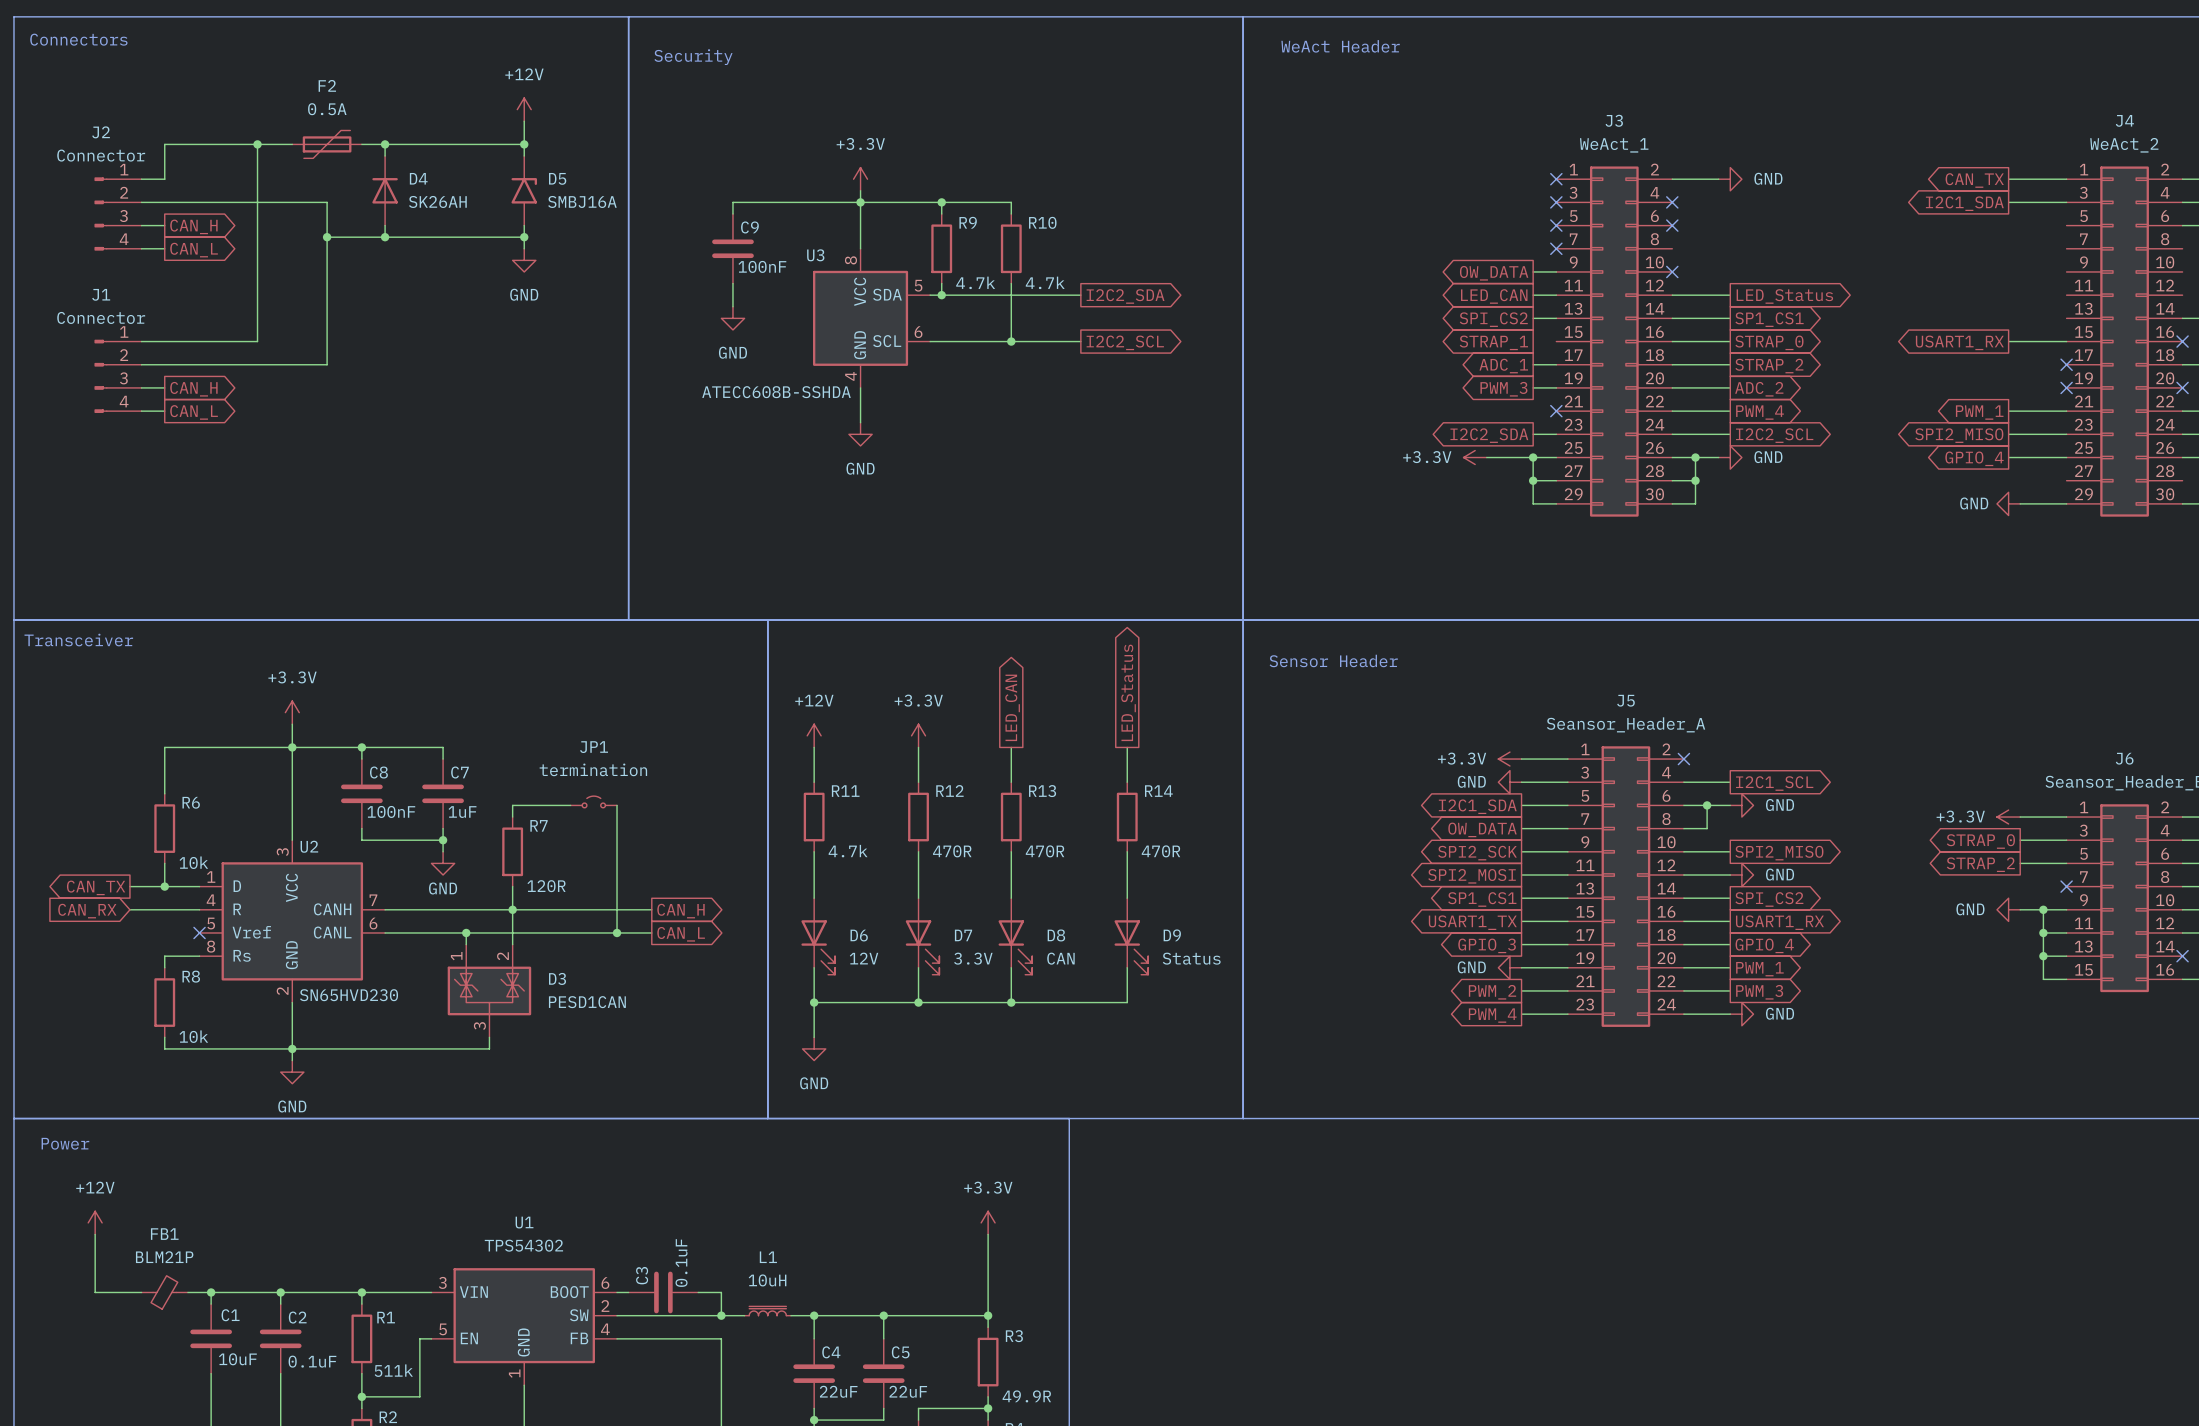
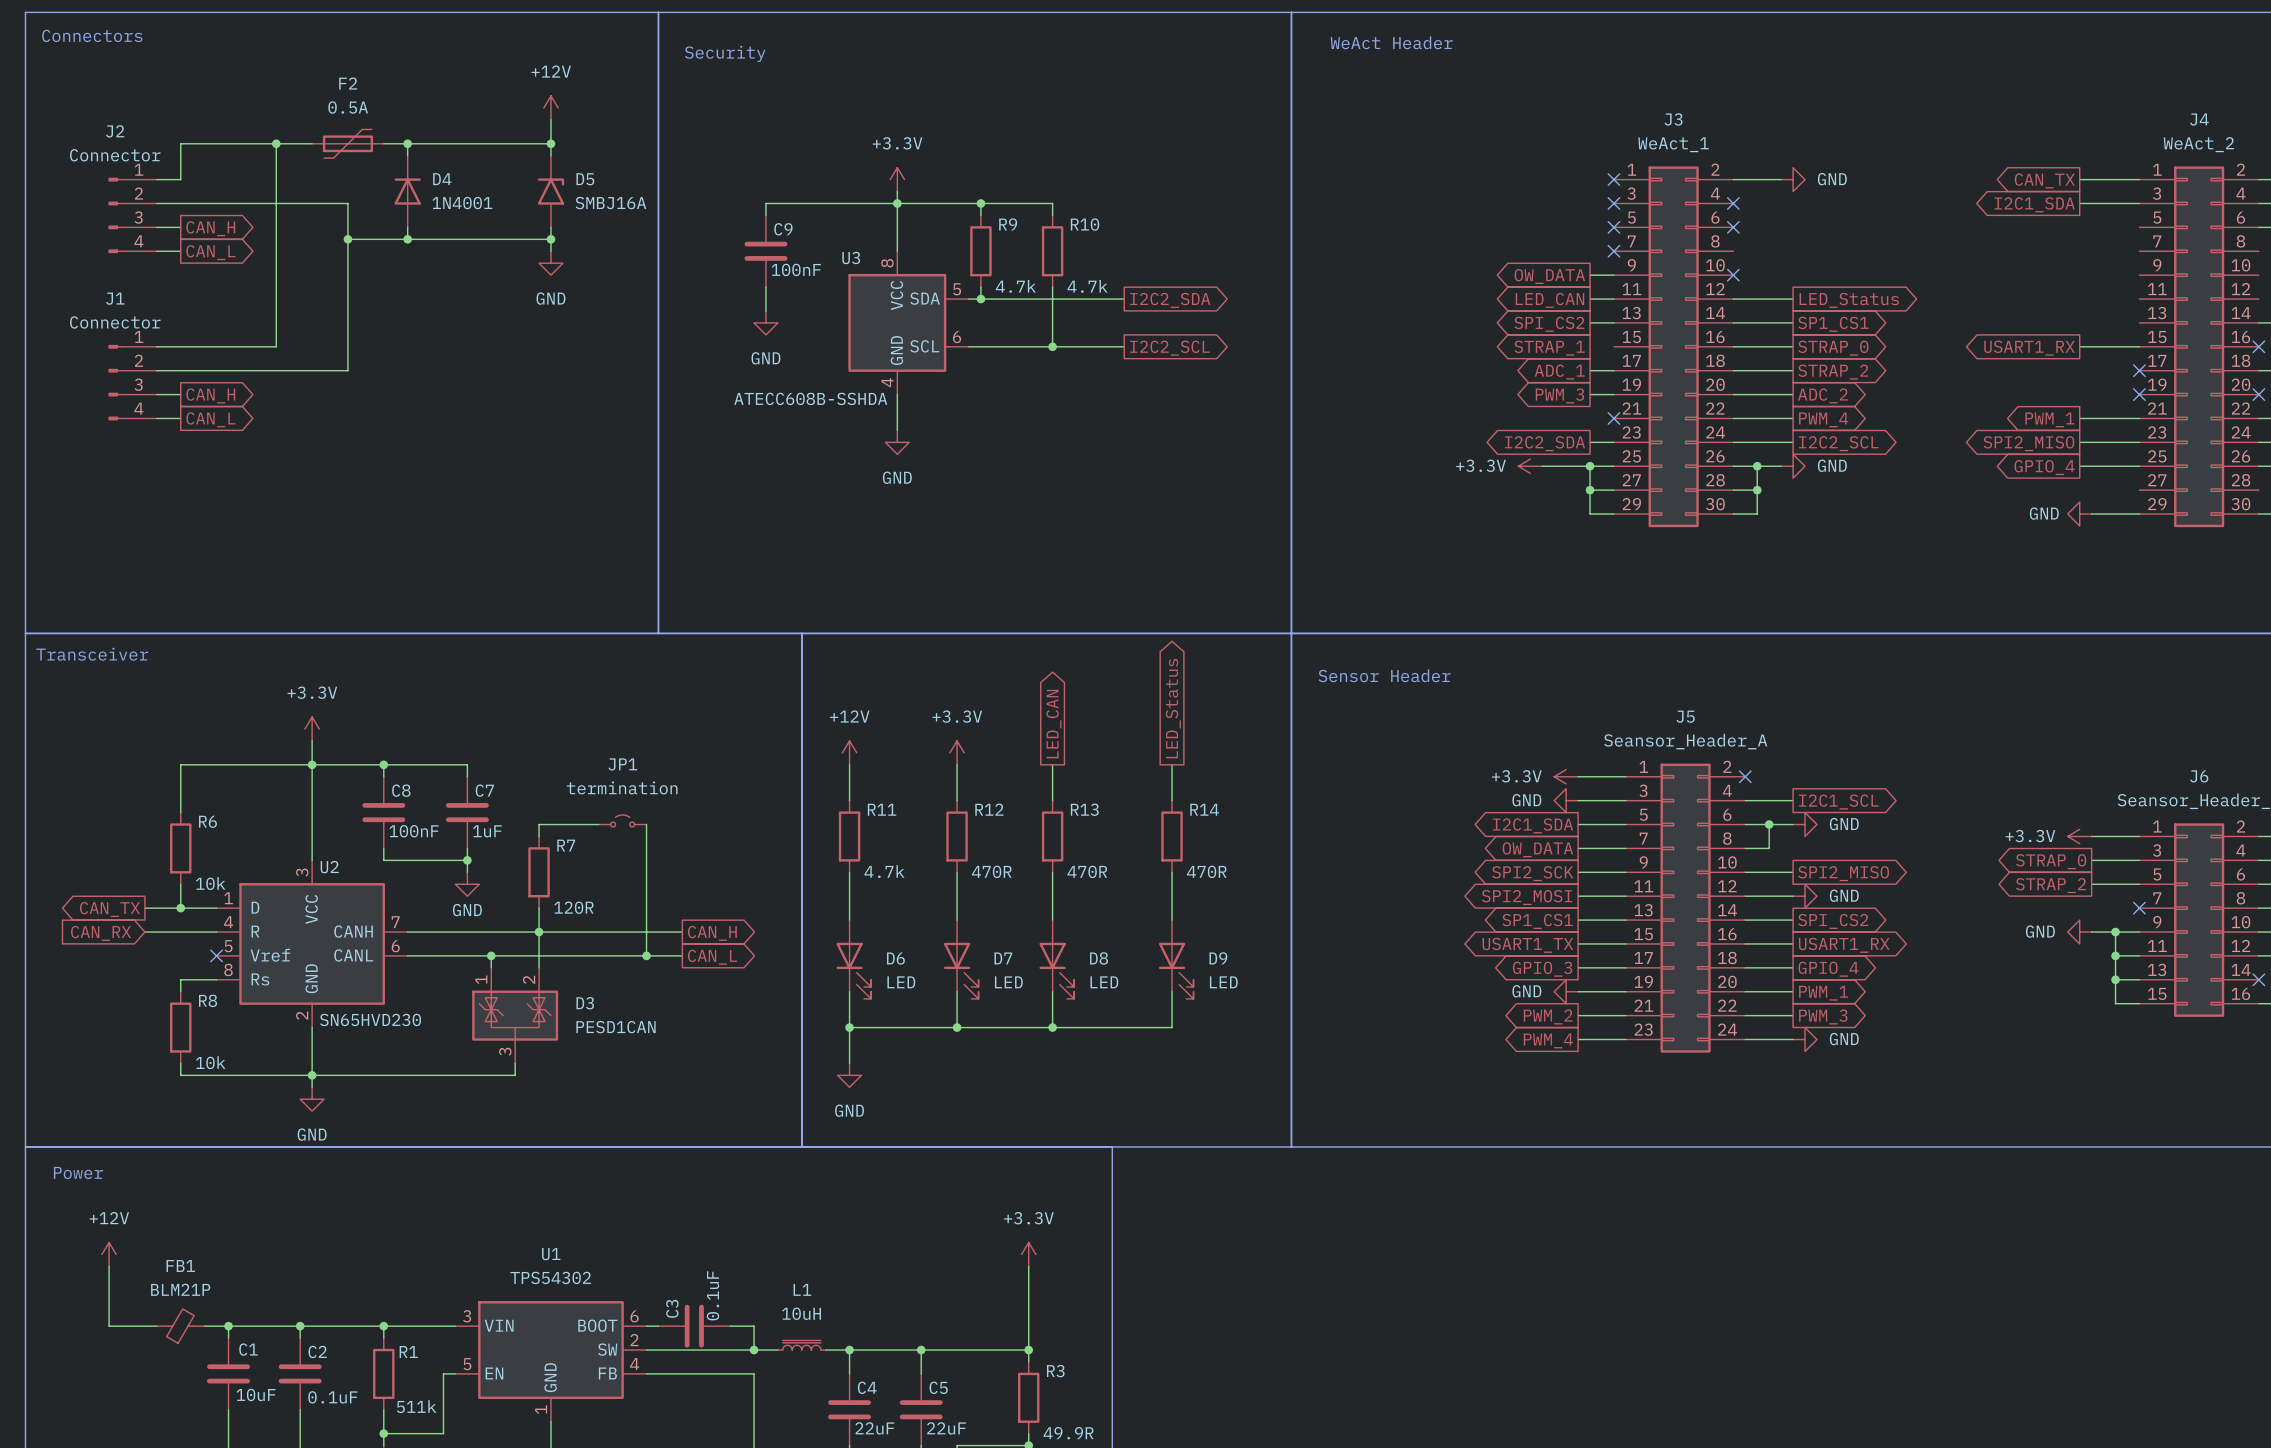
D4 value: SK26AH (437, 201) -> 1N4001 (462, 203)
D6 value: 12V (864, 958) -> LED (901, 982)
D7 value: 3.3V (973, 958) -> LED (1008, 982)
D8 value: CAN (1060, 958) -> LED (1104, 982)
D9 value: Status (1191, 958) -> LED (1223, 982)

